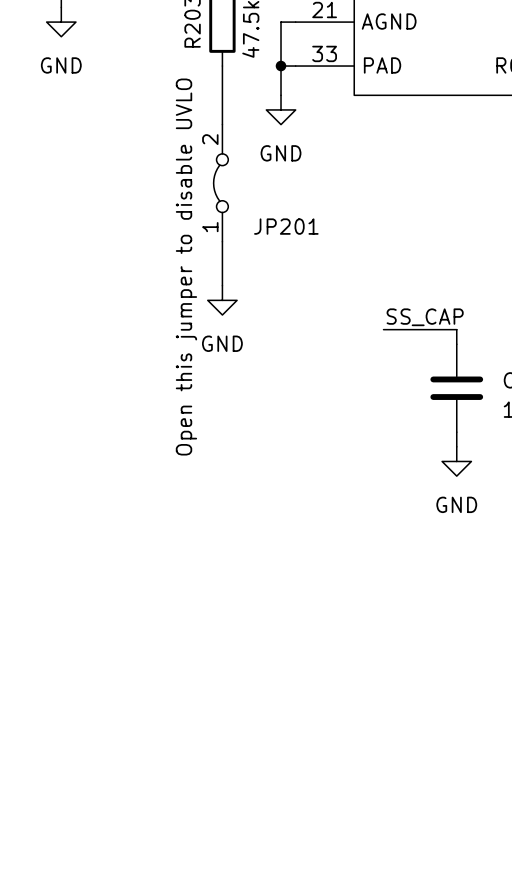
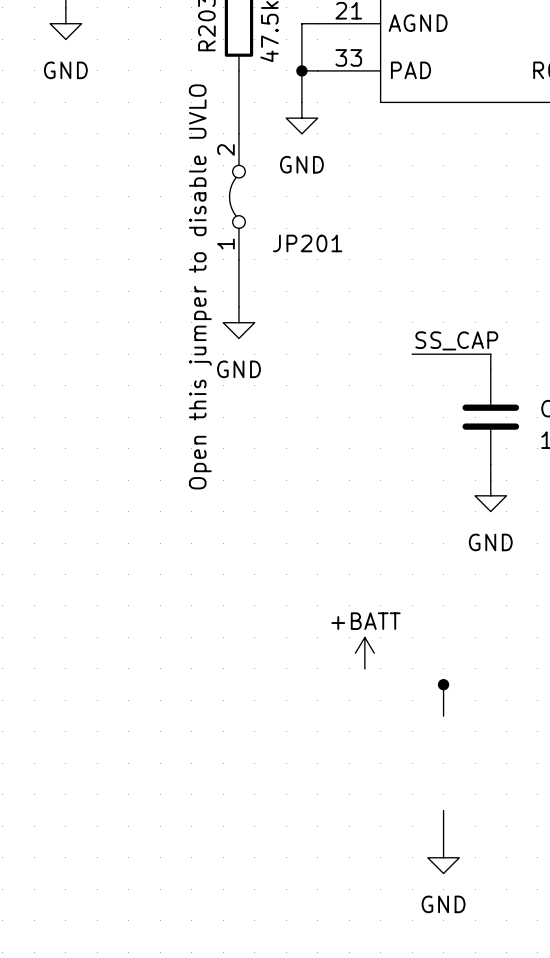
power symbol: none -> +BATT (364, 653)
wire: none -> (443, 684) (443, 716)
junction: none -> (443, 684)
wire: none -> (443, 810) (443, 842)
power symbol: none -> GND (443, 857)

